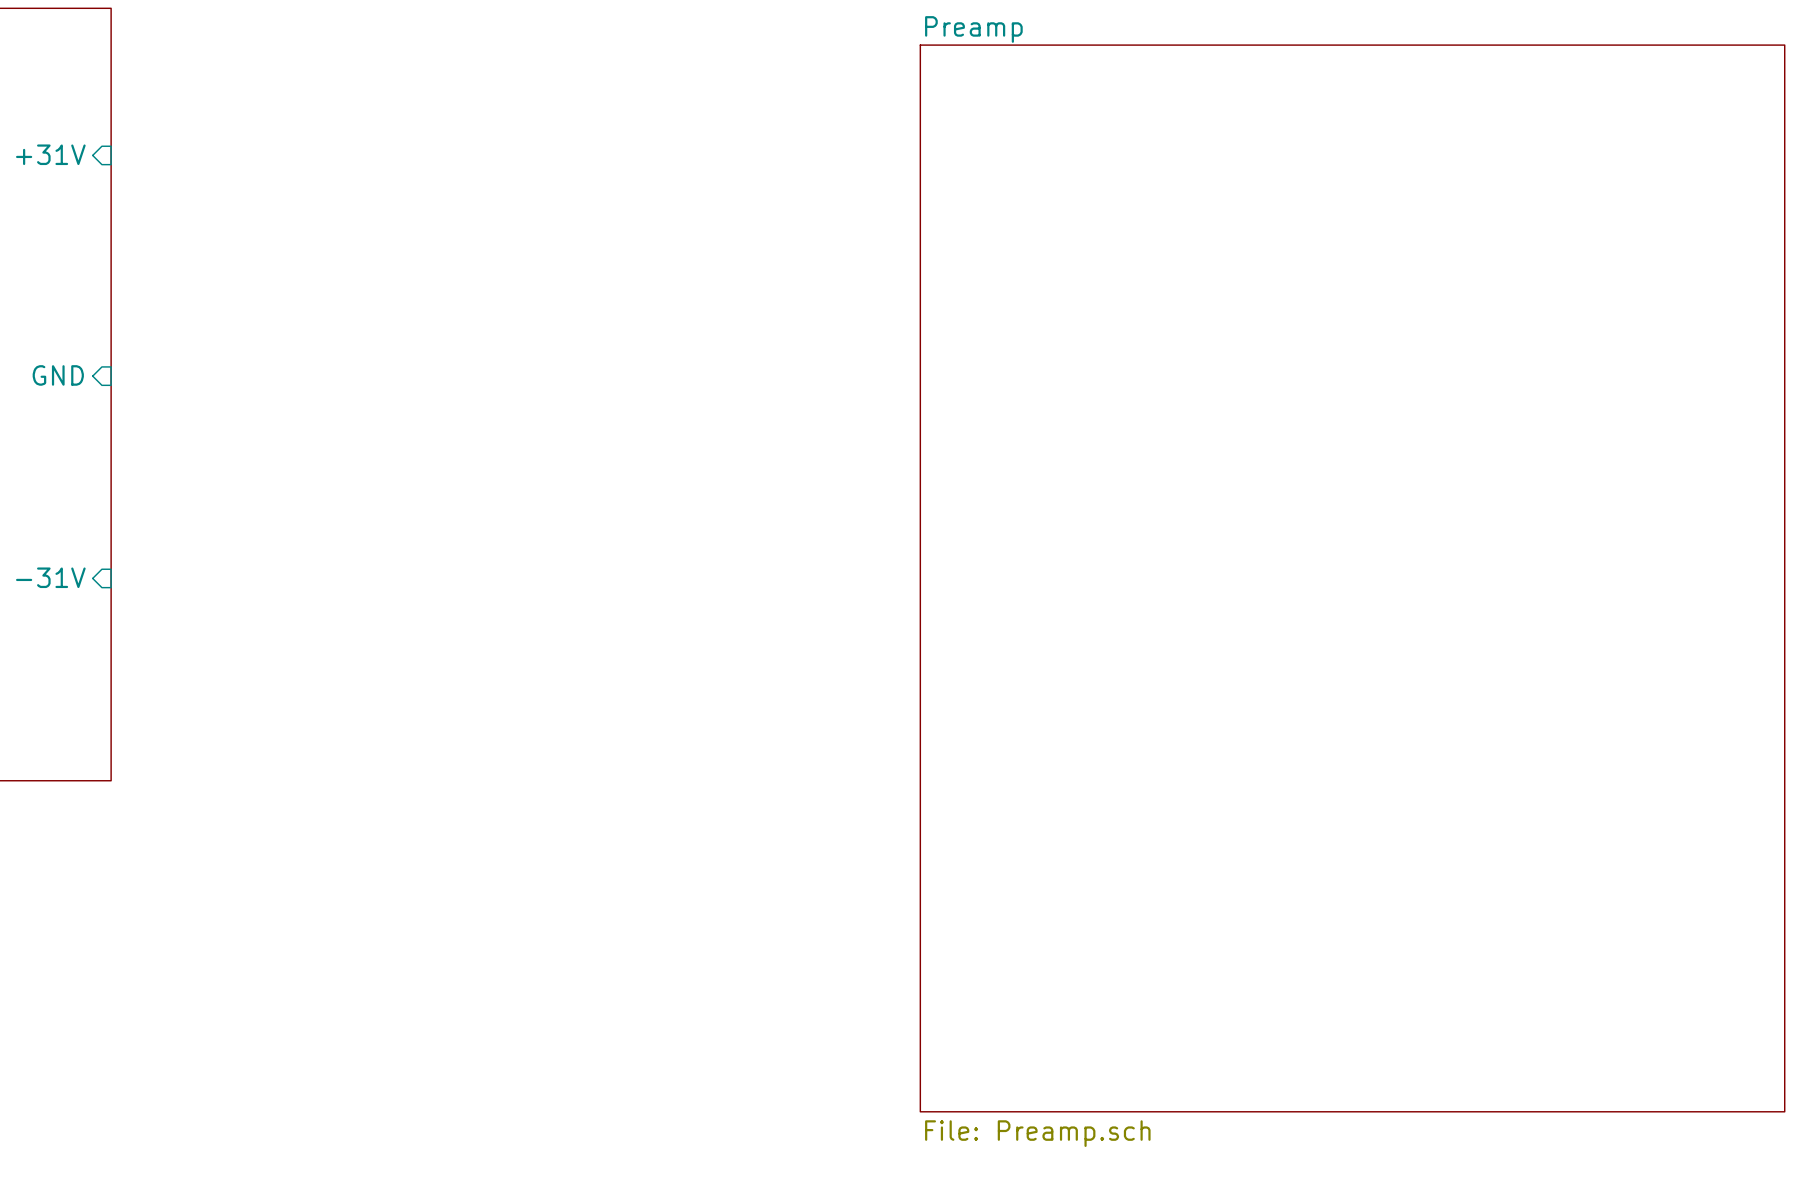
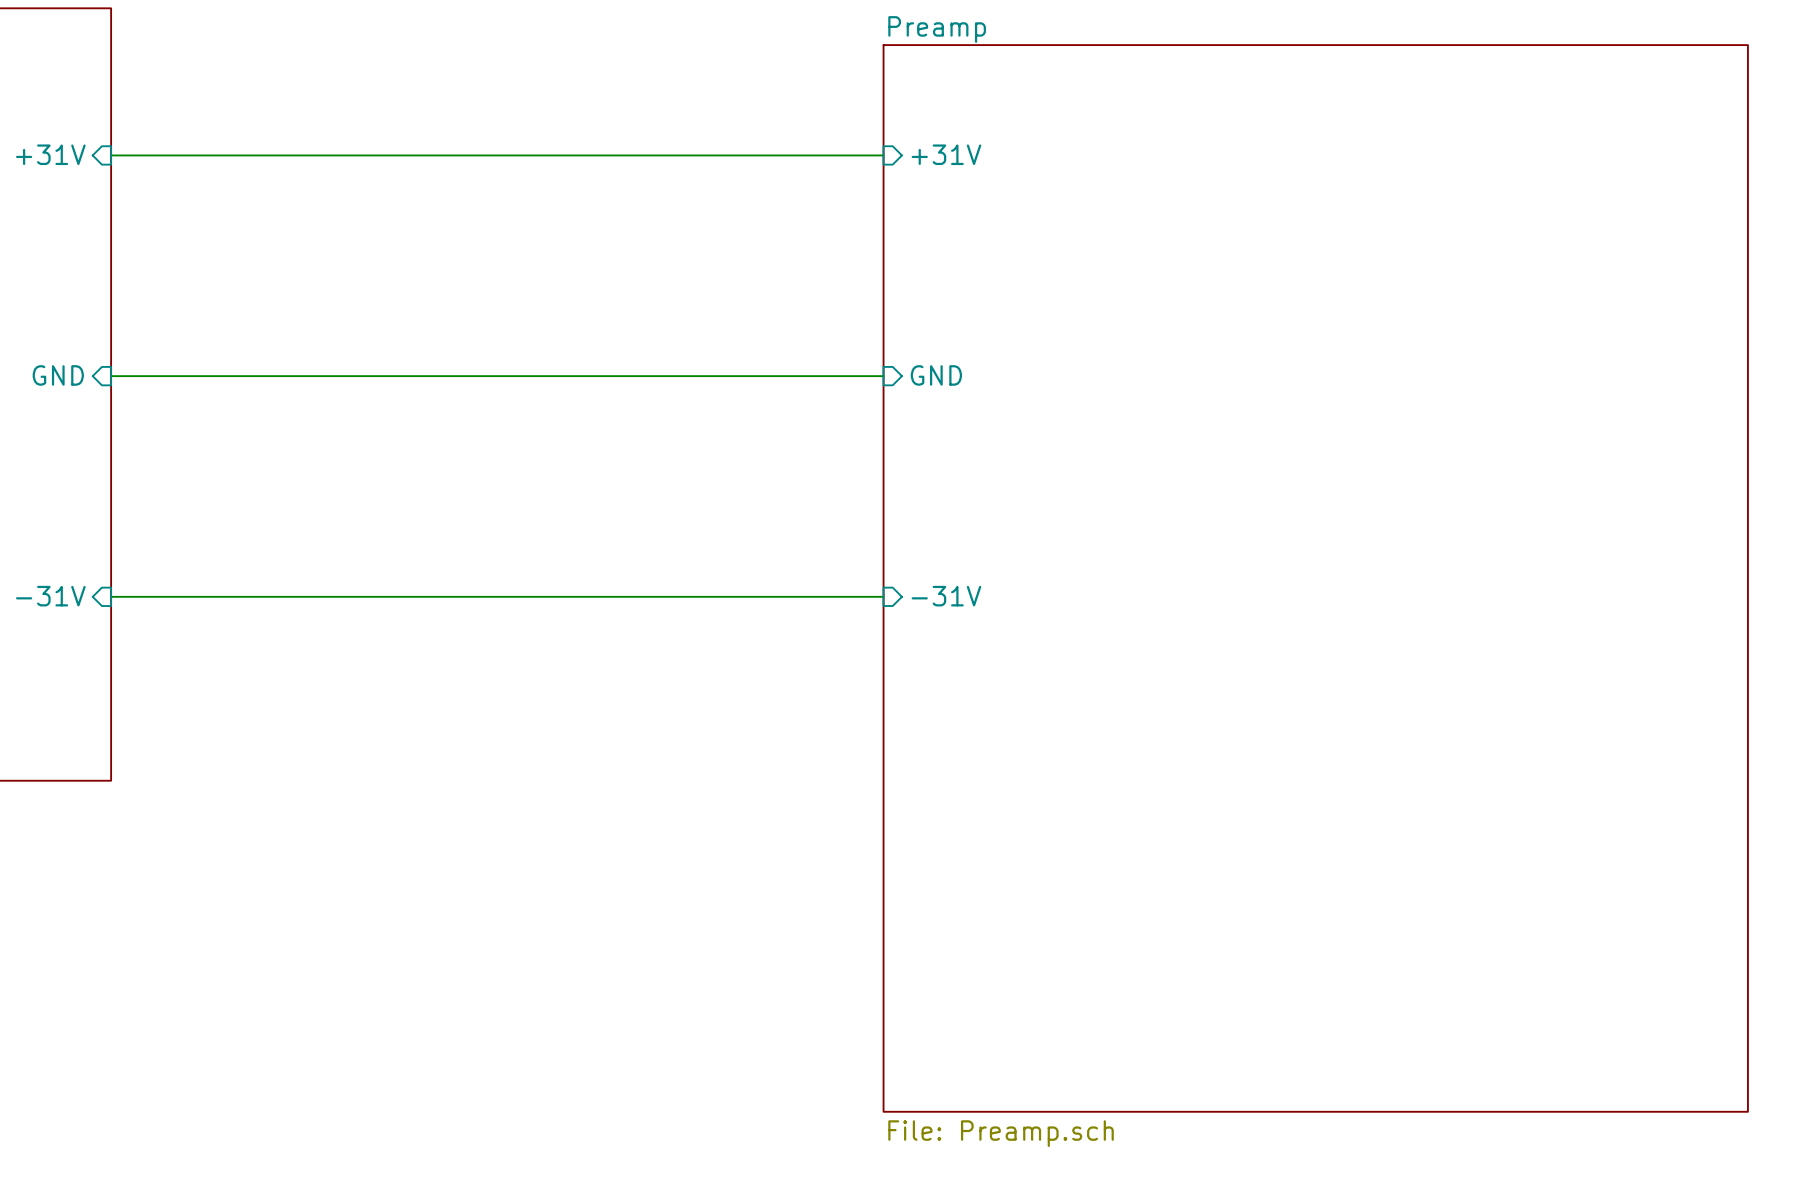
sheet pin: none -> +31V (946, 154)
wire: none -> (111, 155) (883, 155)
sheet pin: none -> GND (936, 375)
wire: none -> (111, 376) (883, 376)
sheet pin position: -31V (50, 577) -> -31V (50, 596)
sheet Preamp position: (1352, 578) -> (1315, 578)
wire: none -> (111, 596) (883, 596)
sheet pin: none -> -31V (946, 596)

